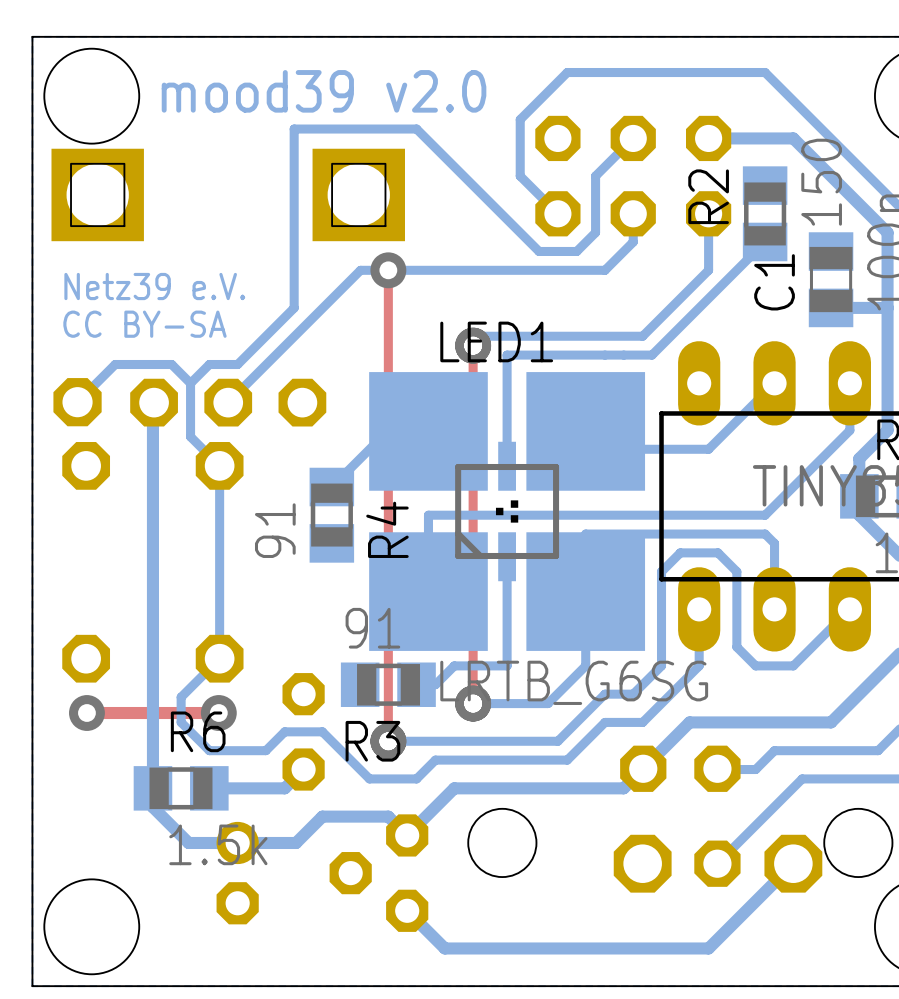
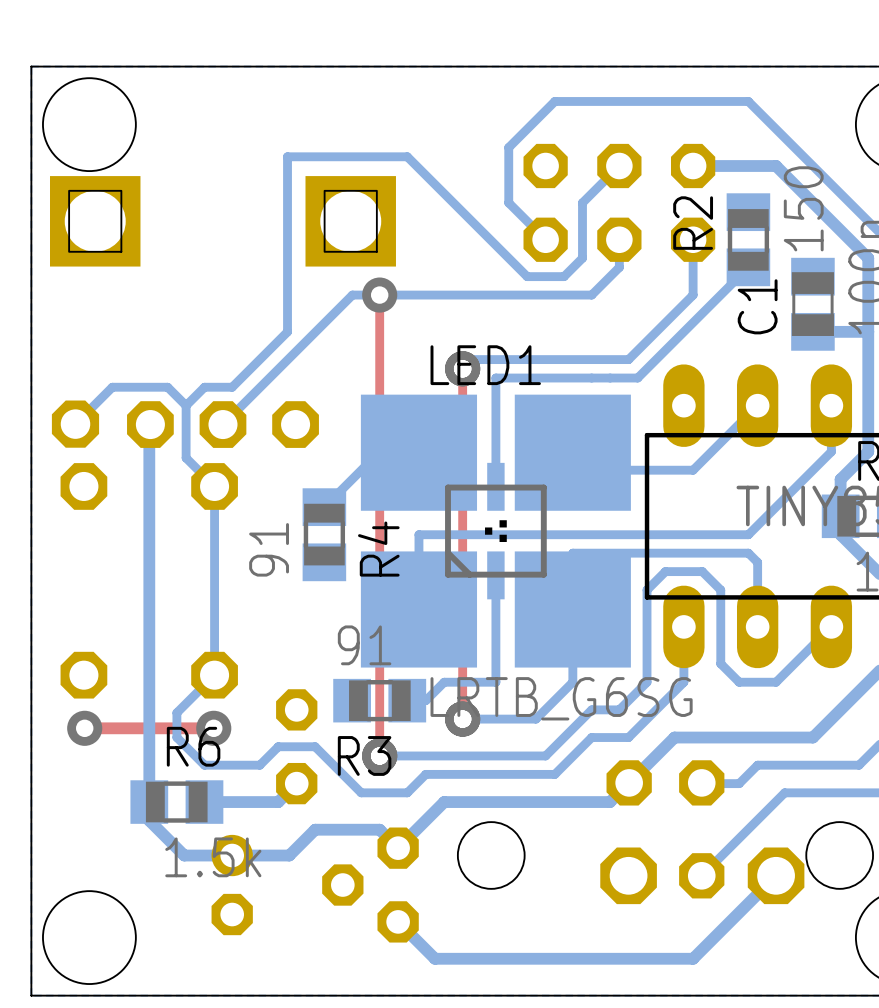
text: mood39 v2.0 (324, 91) -> none
text: Netz39 e.V. (154, 286) -> none
text: CC BY-SA (144, 324) -> none

